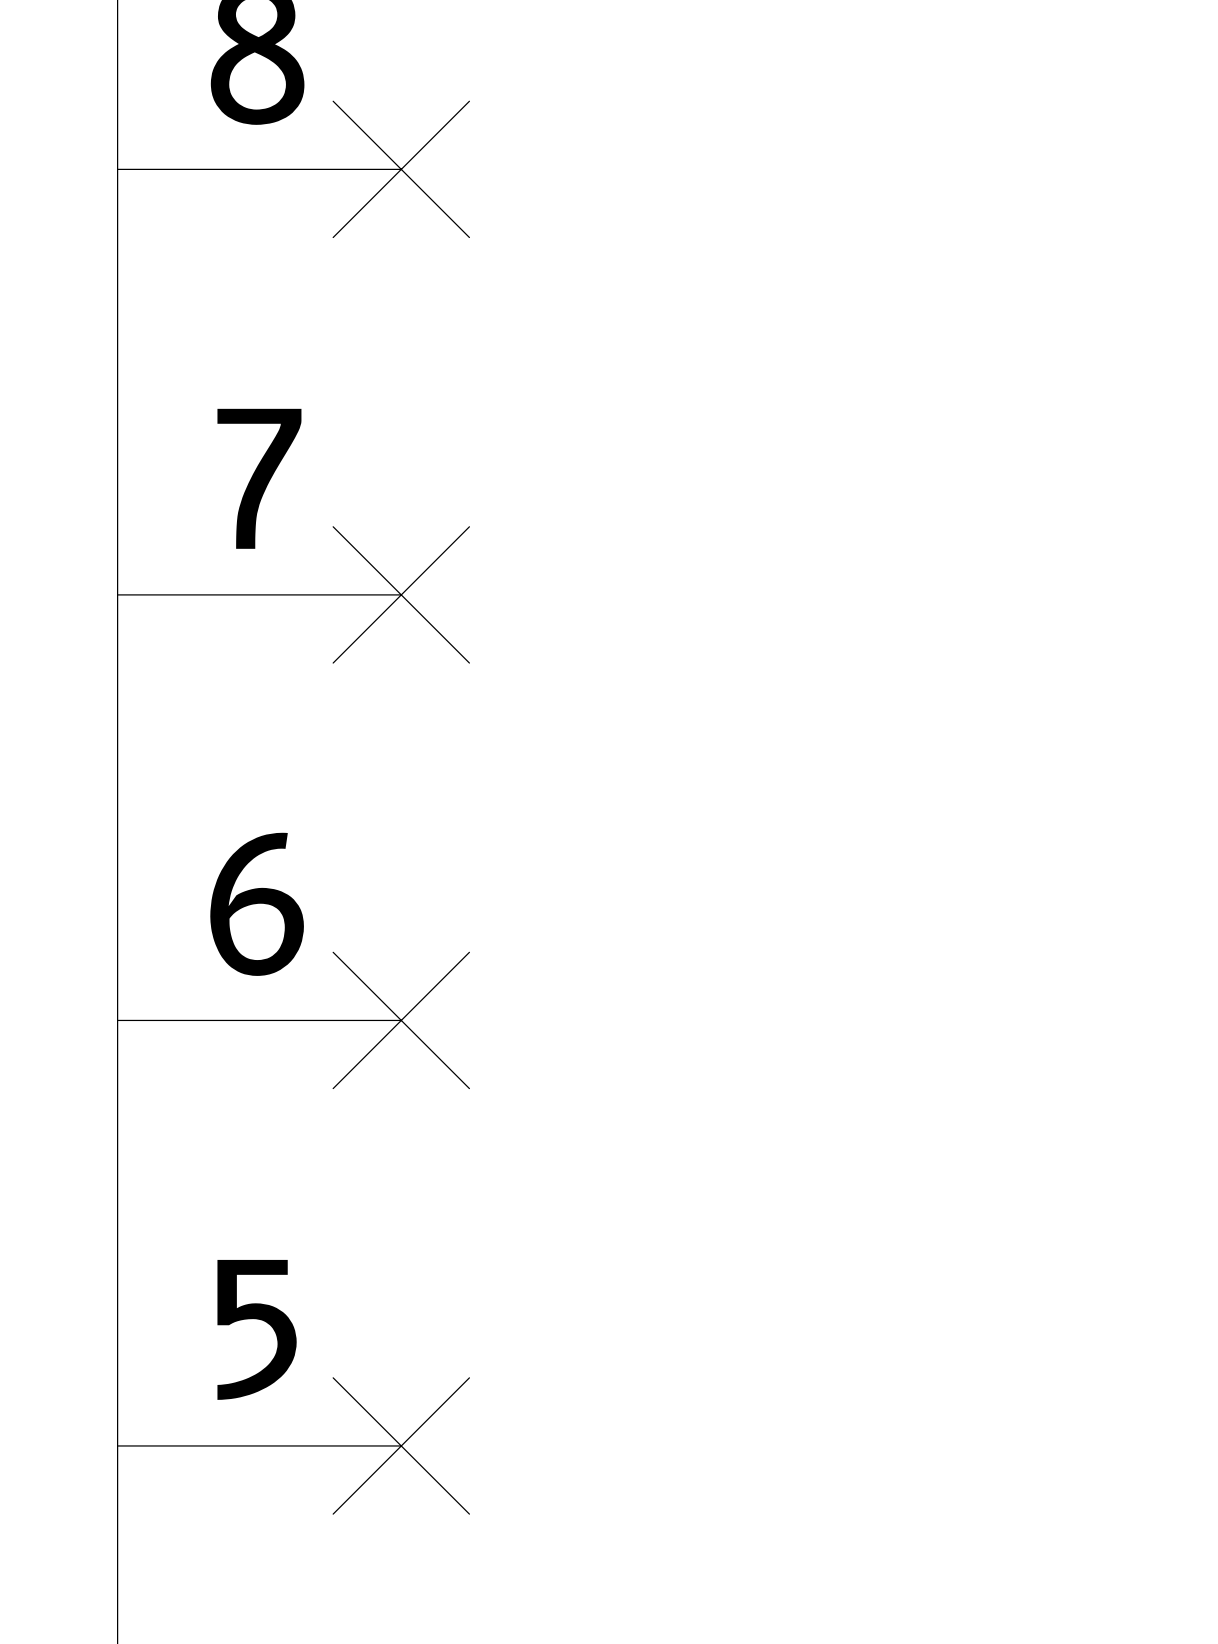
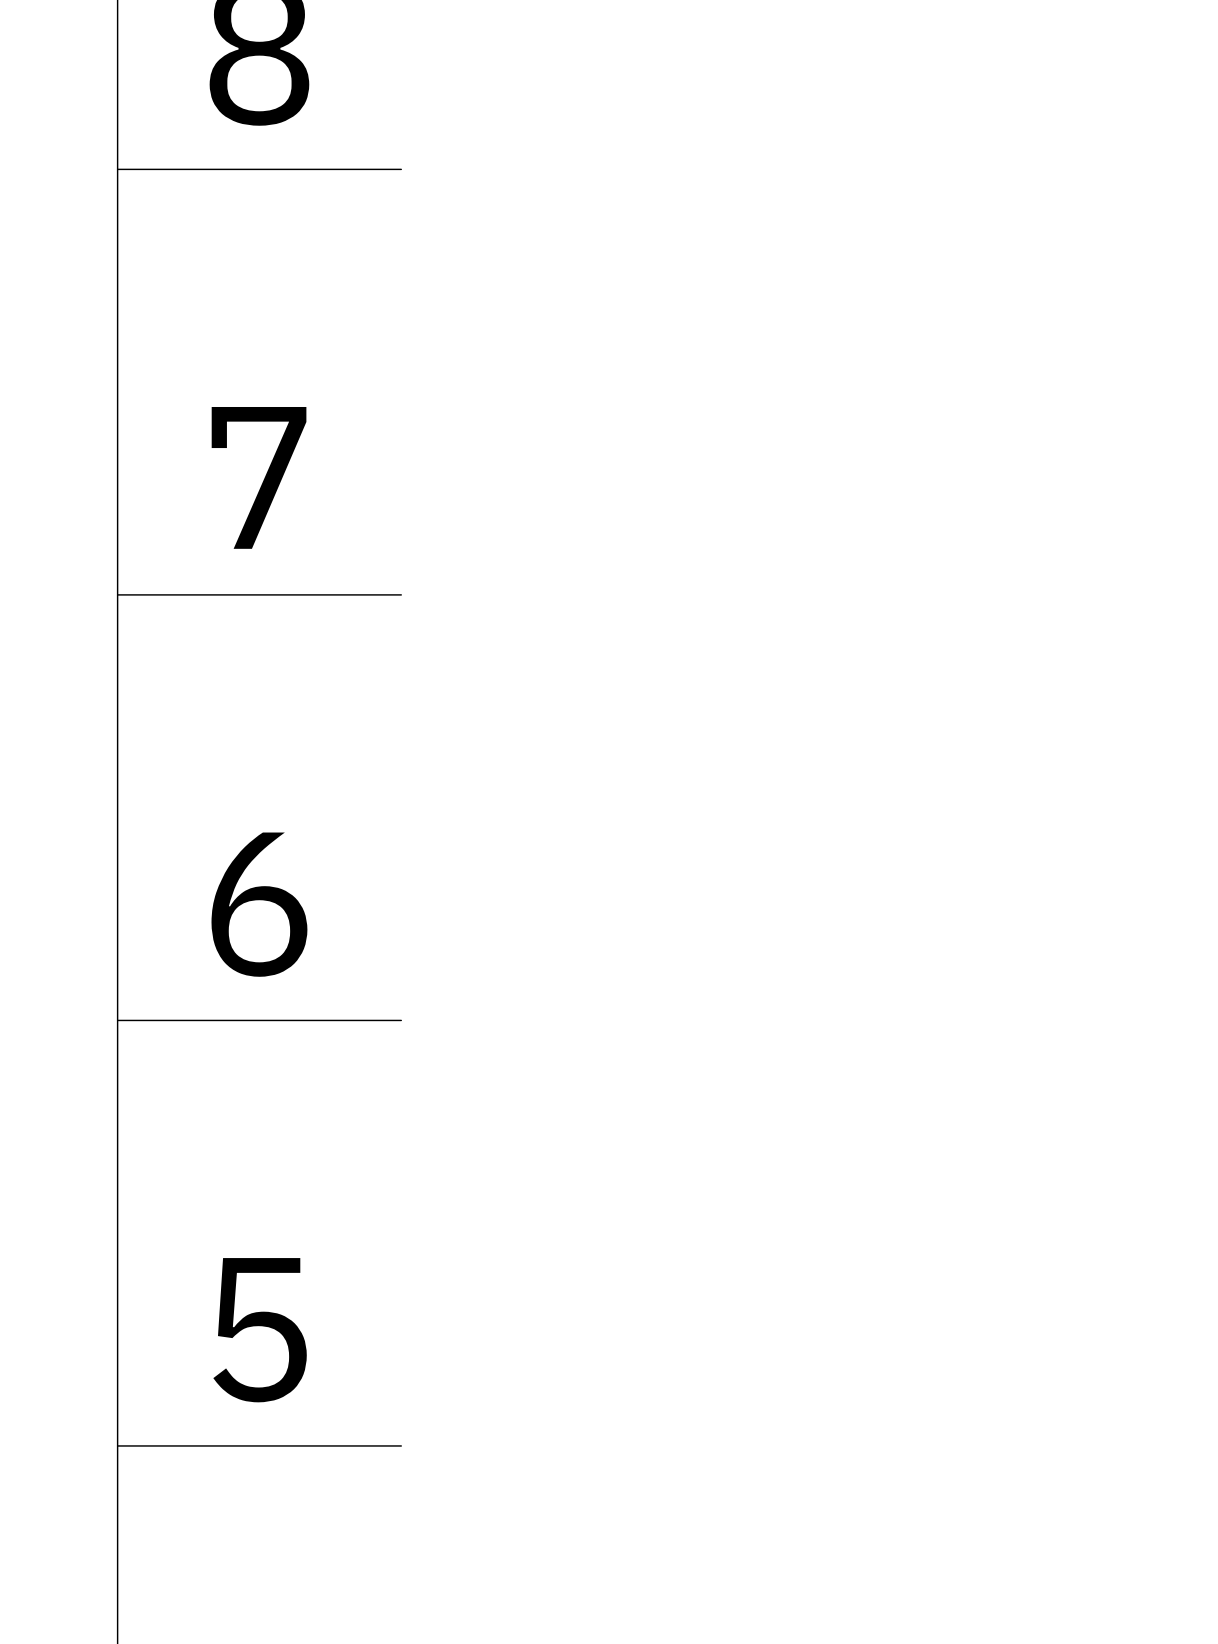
no-connect mark: (401, 169) -> none
no-connect mark: (401, 594) -> none
no-connect mark: (401, 1020) -> none
no-connect mark: (401, 1445) -> none

